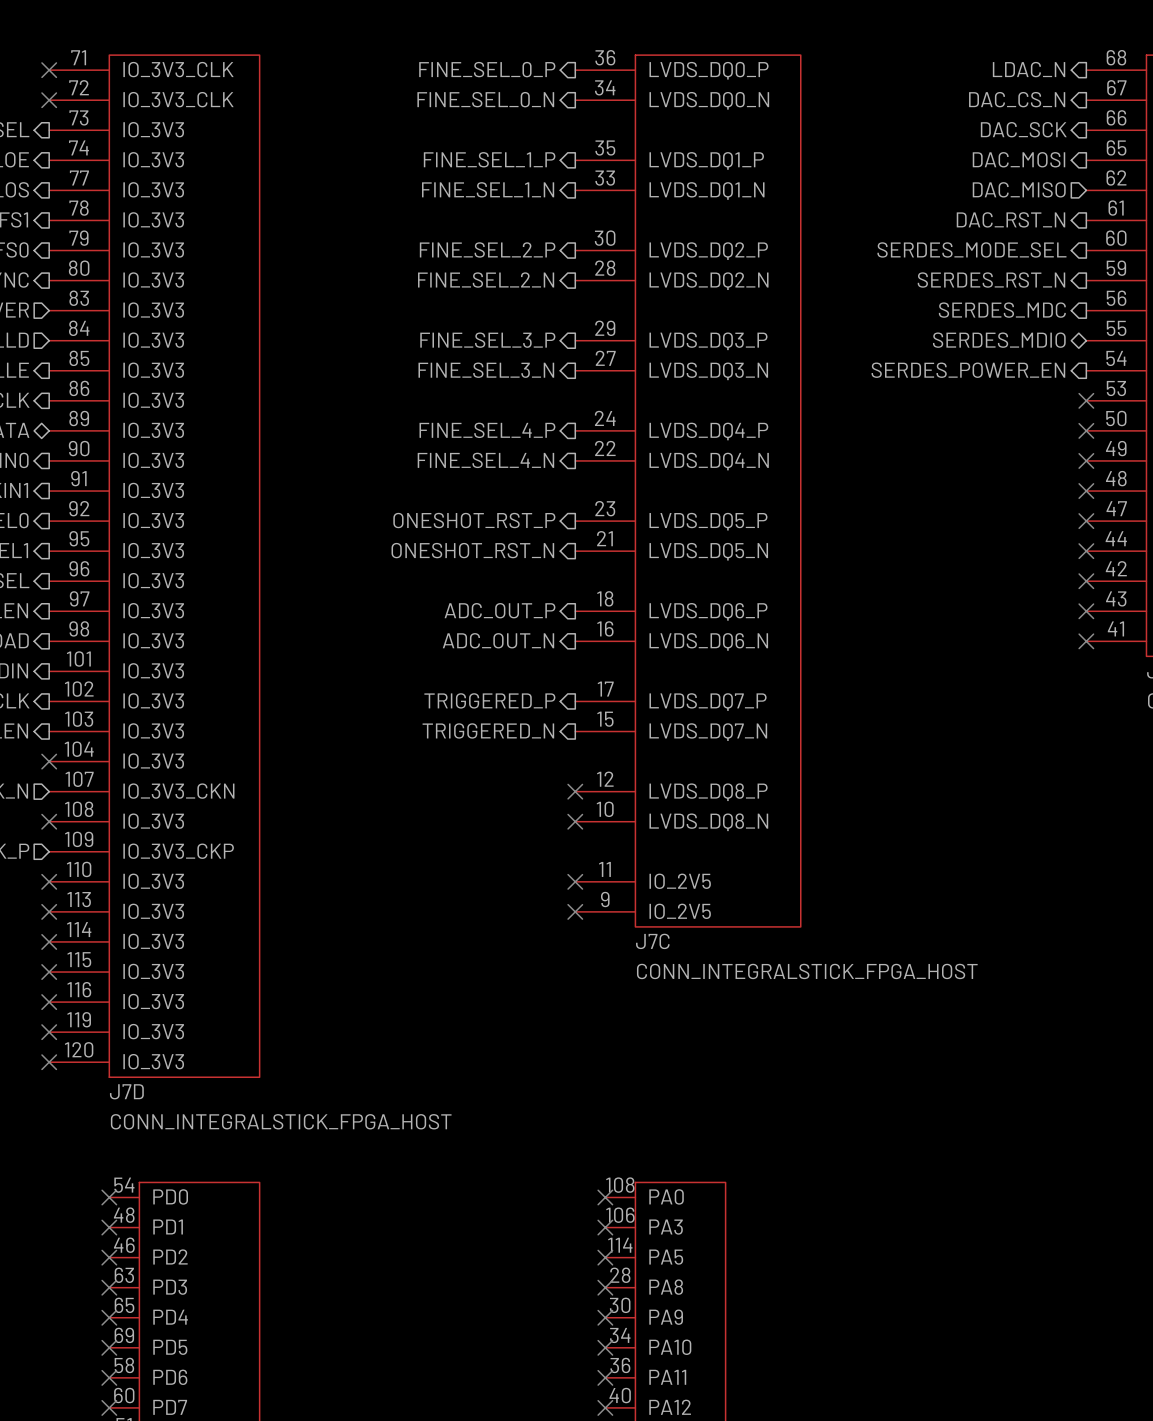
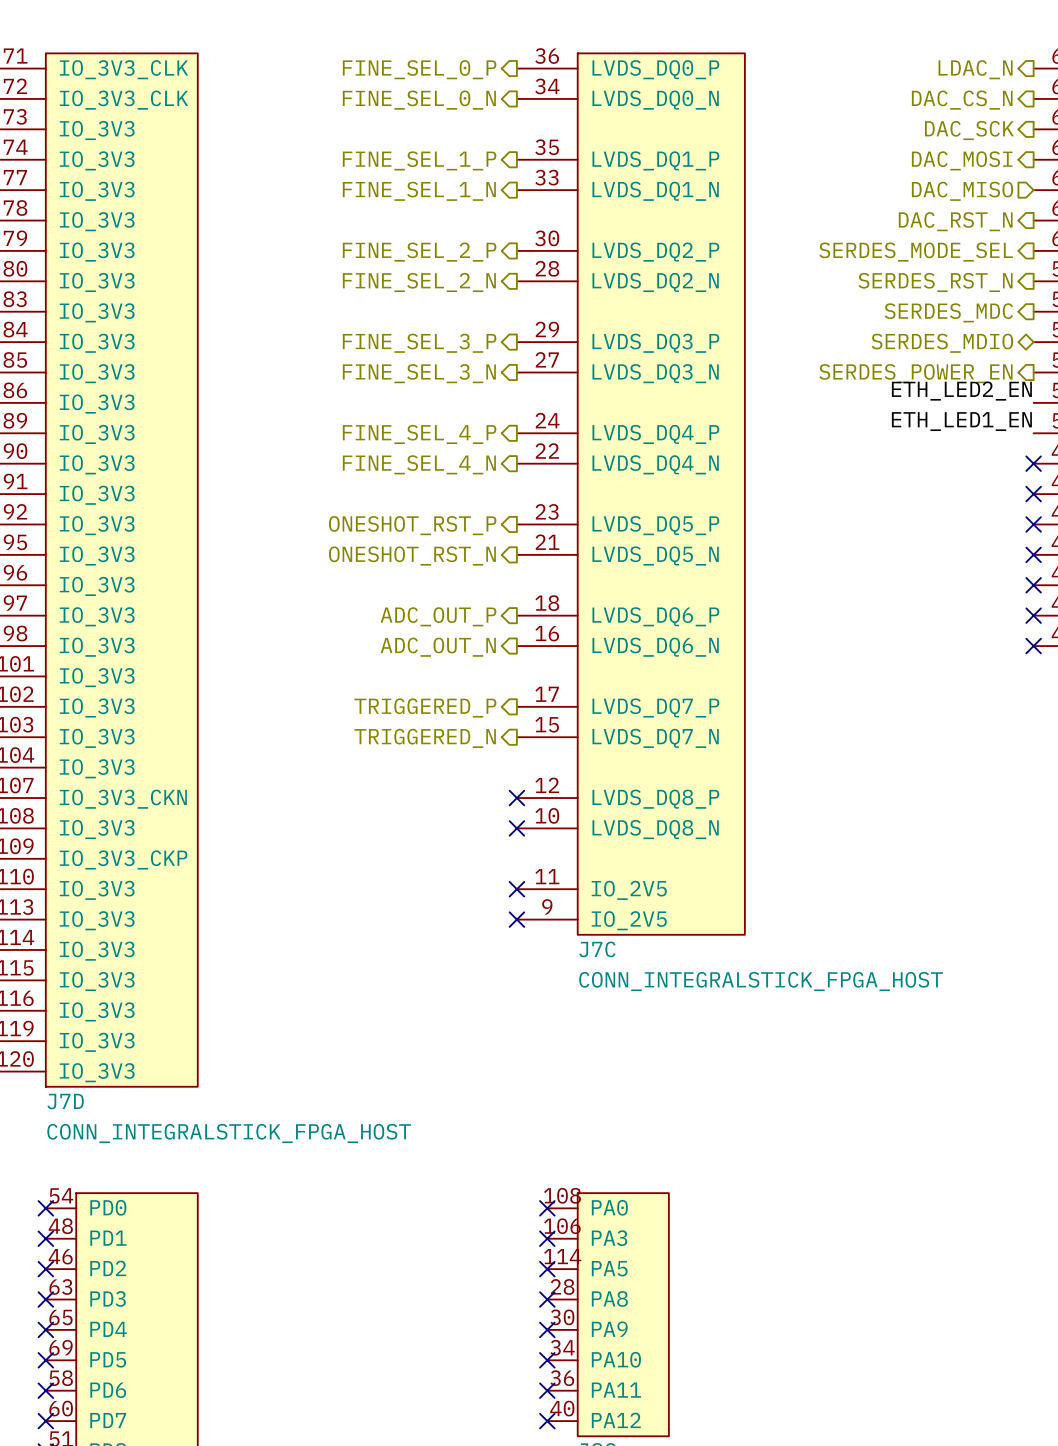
label: none -> ETH_LED2_EN (961, 391)
no-connect mark: (1086, 400) -> none
label: none -> ETH_LED1_EN (961, 421)
no-connect mark: (1086, 430) -> none

